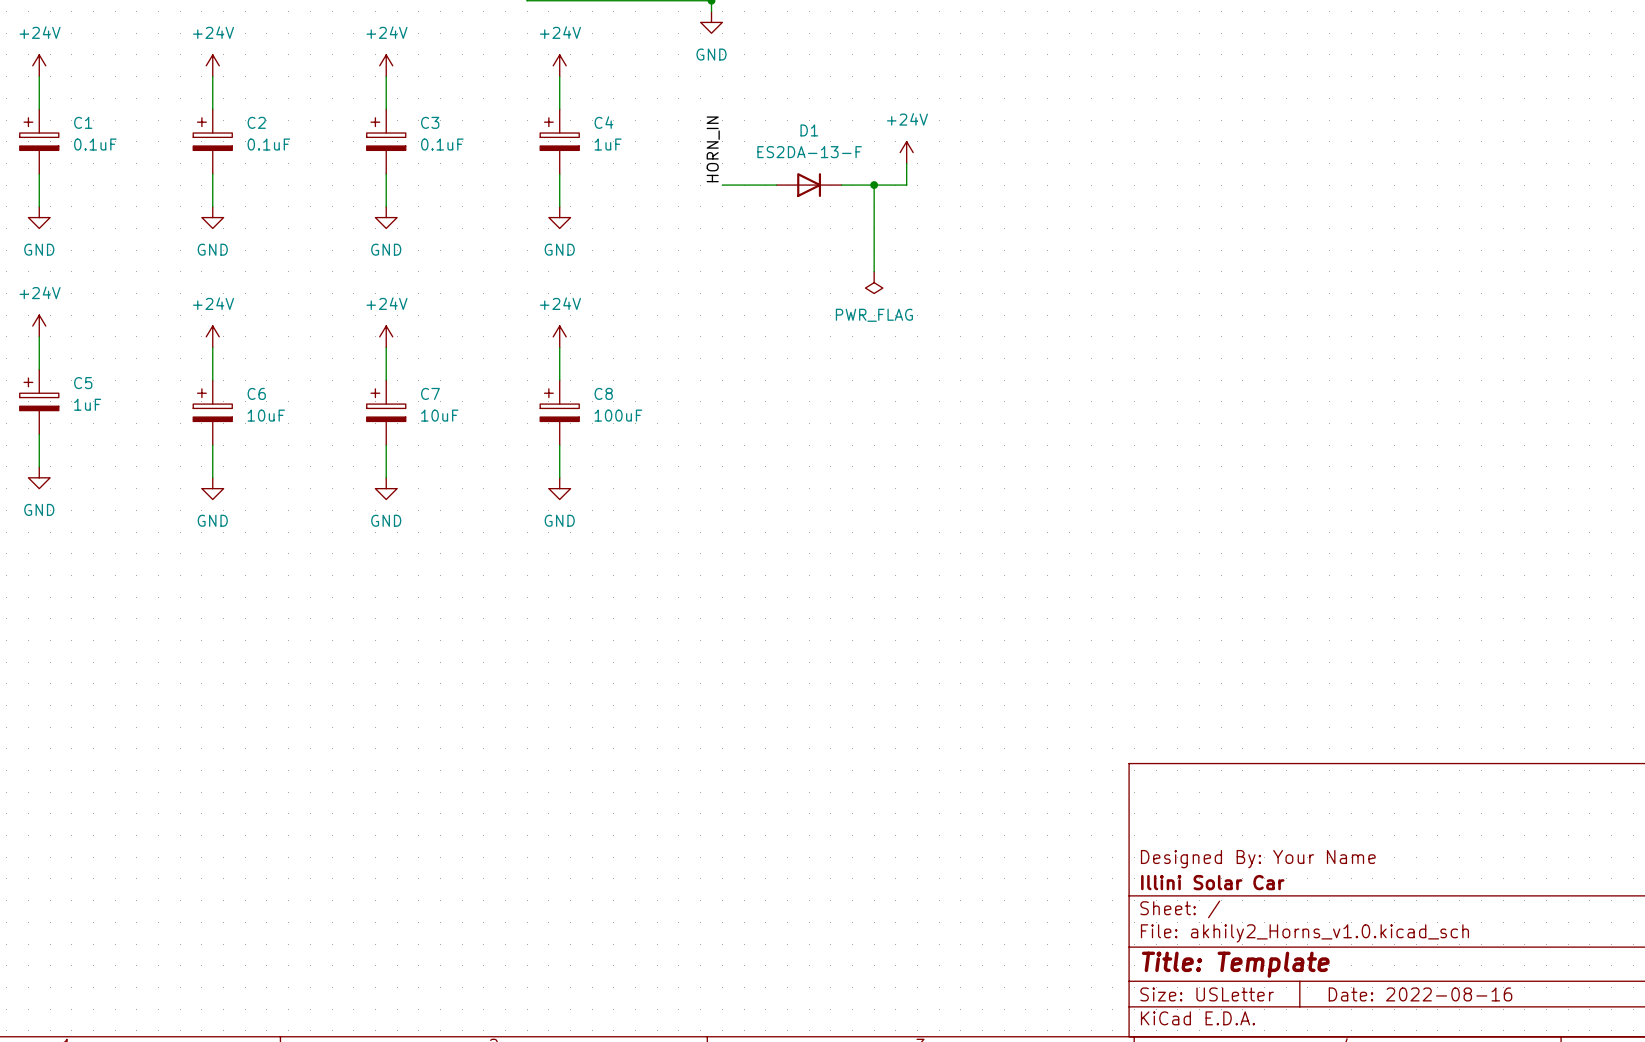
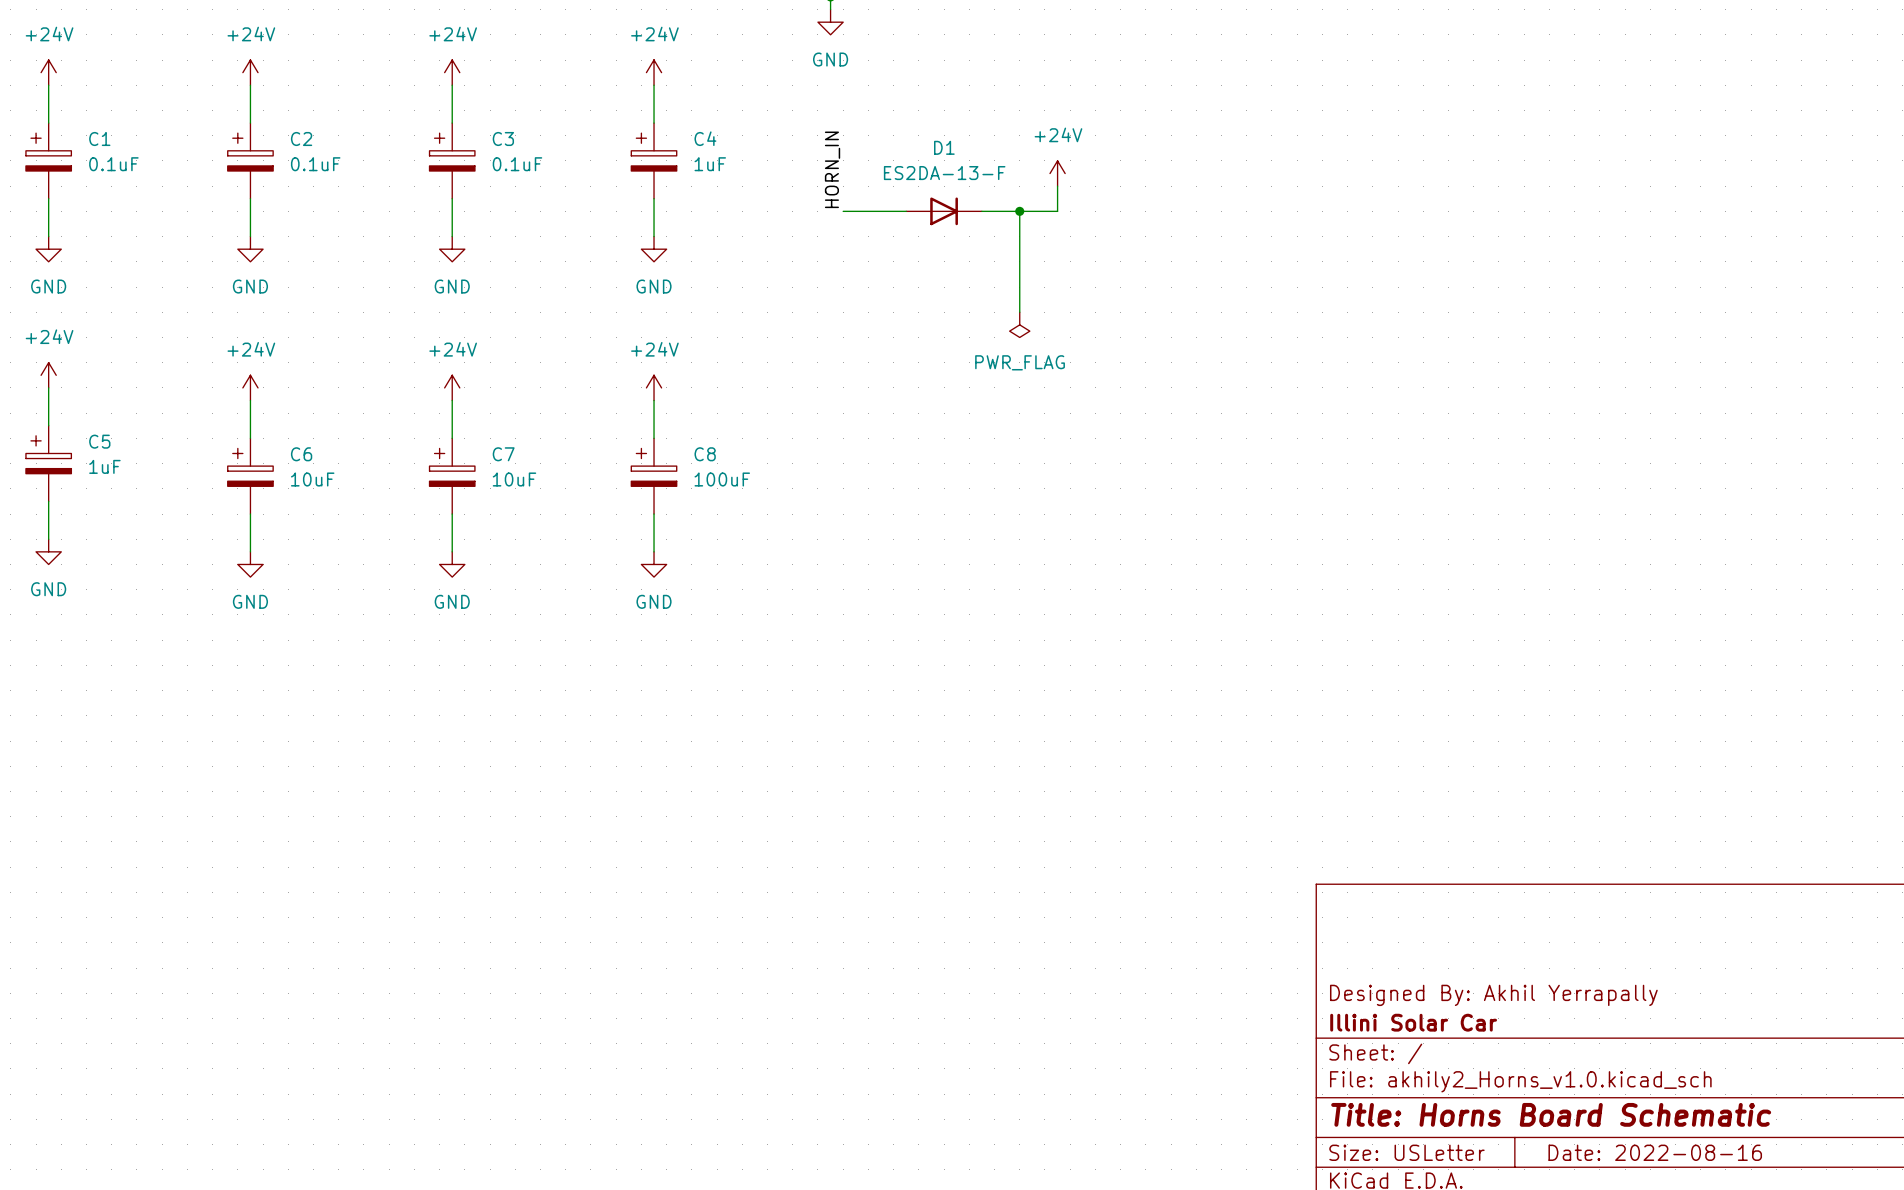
title block: Designed By: Your Name (1258, 859) -> Designed By: Akhil Yerrapally (1493, 995)
title block: Title: Template (1235, 964) -> Title: Horns Board Schematic (1551, 1114)

